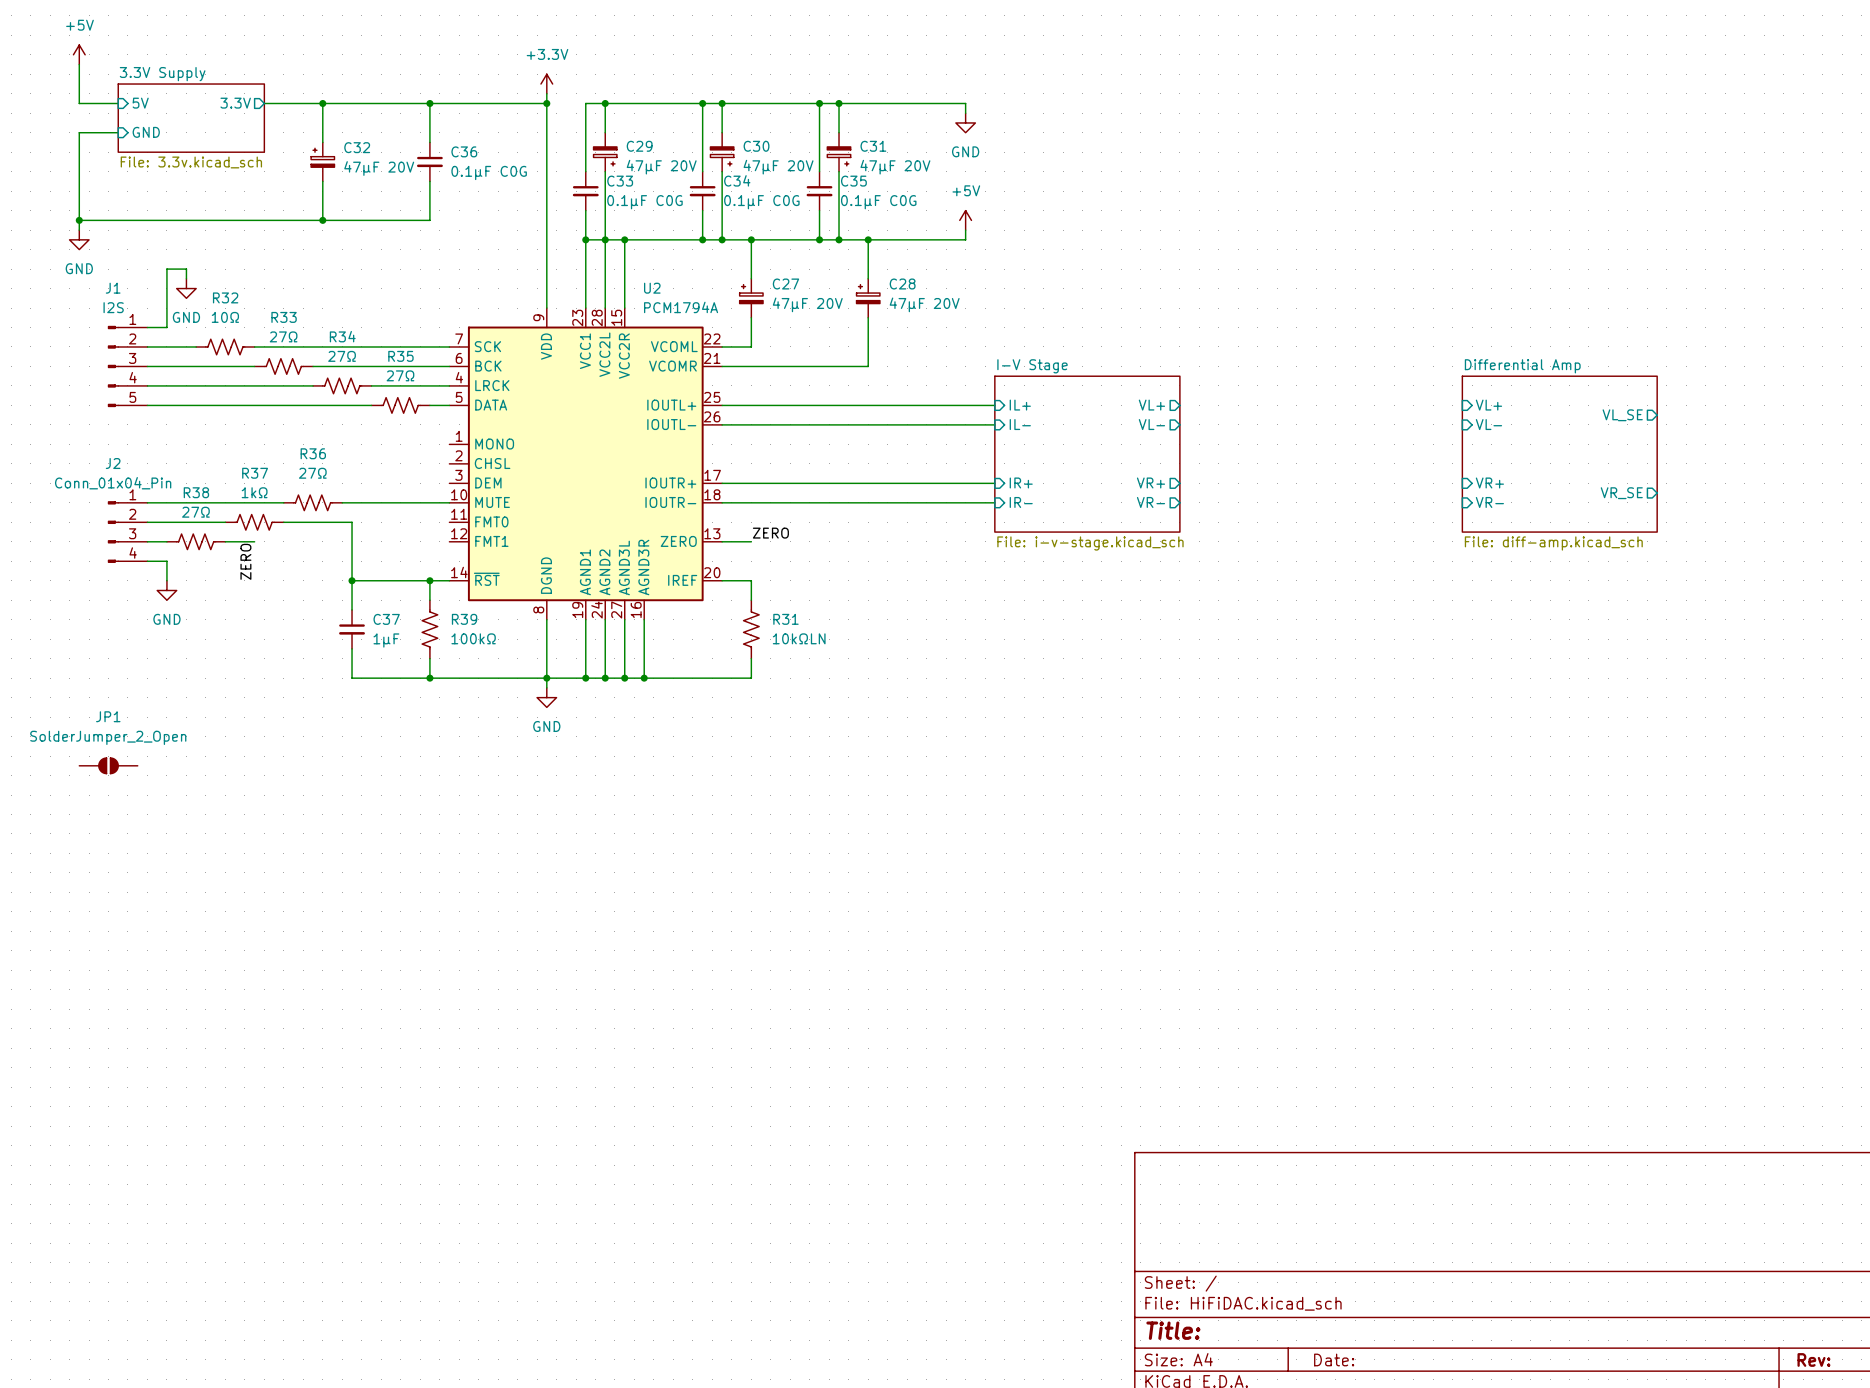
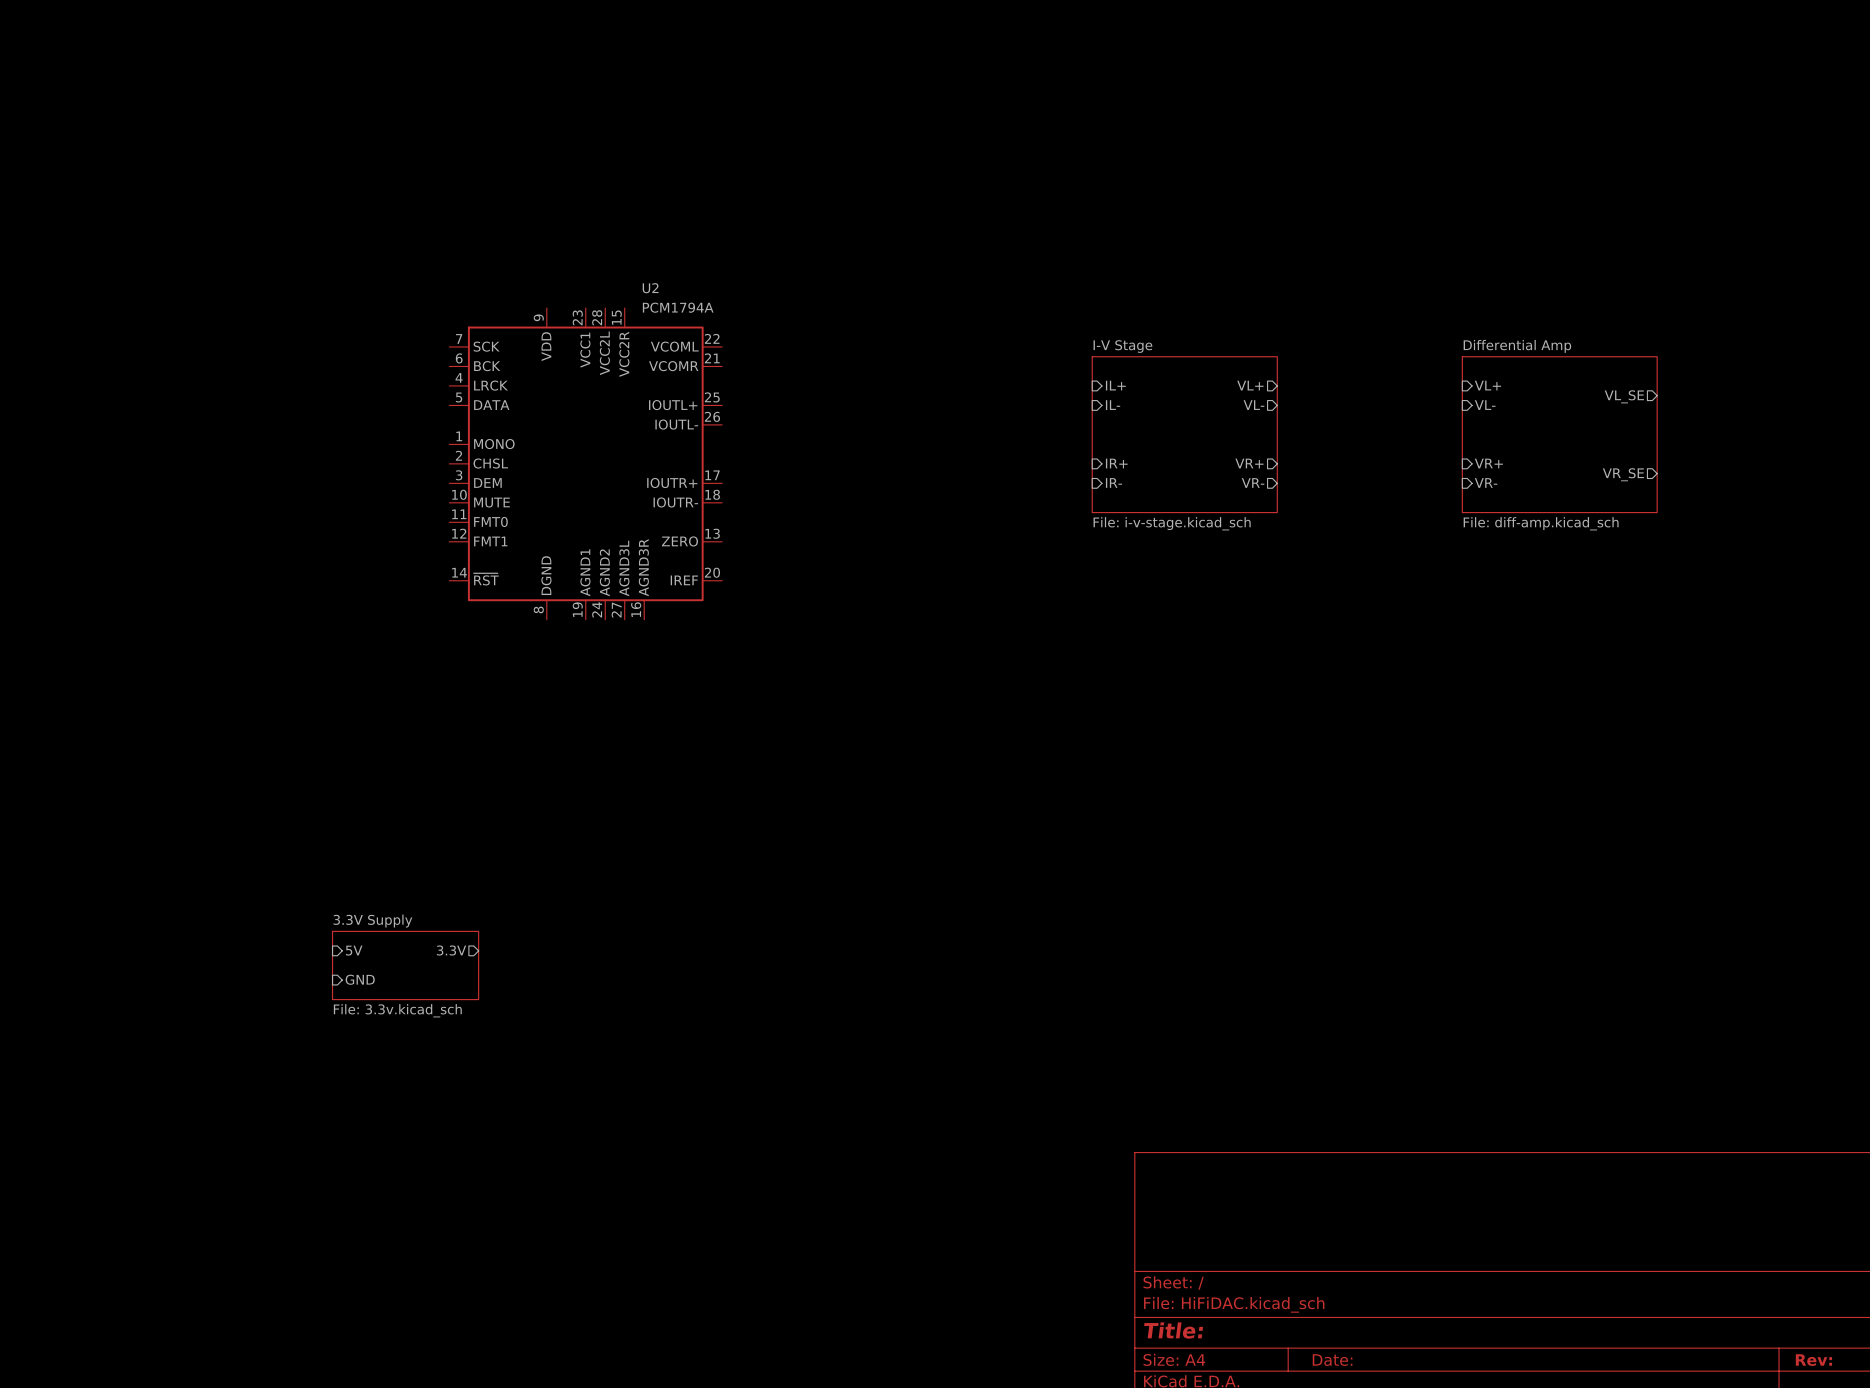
power symbol: +5V (79, 54) -> none
wire: (79, 64) (79, 103) (118, 103) -> none
power symbol: +3.3V (546, 84) -> none
wire: (546, 93) (546, 308) -> none
sheet pin: 5V (140, 103) -> none
sheet pin: 3.3V (235, 103) -> none
wire: (264, 103) (546, 103) -> none
wire: (322, 103) (322, 142) -> none
junction: (322, 103) -> none
wire: (429, 103) (429, 142) -> none
junction: (429, 103) -> none
junction: (546, 103) -> none
wire: (605, 103) (605, 132) -> none
junction: (605, 103) -> none
wire: (702, 103) (702, 171) -> none
junction: (702, 103) -> none
wire: (722, 103) (722, 132) -> none
junction: (722, 103) -> none
wire: (819, 103) (819, 171) -> none
junction: (819, 103) -> none
wire: (839, 103) (839, 132) -> none
junction: (839, 103) -> none
wire: (965, 113) (965, 103) (585, 103) (585, 171) -> none
sheet 3.3V Supply position: (191, 118) -> (405, 965)
power symbol: GND (965, 122) -> none
wire: (118, 132) (79, 132) (79, 230) -> none
sheet pin: GND (146, 132) -> none
C29: 47µF 20V (605, 152) -> none
C30: 47µF 20V (722, 152) -> none
C31: 47µF 20V (839, 152) -> none
C32: 47µF 20V (322, 161) -> none
C36: 0.1µF C0G (429, 161) -> none
wire: (605, 171) (605, 308) -> none
wire: (722, 171) (722, 239) -> none
wire: (839, 171) (839, 239) -> none
wire: (322, 181) (322, 220) -> none
wire: (429, 181) (429, 220) (79, 220) -> none
C33: 0.1µF C0G (585, 191) -> none
C34: 0.1µF C0G (702, 191) -> none
C35: 0.1µF C0G (819, 191) -> none
wire: (585, 210) (585, 308) -> none
wire: (702, 210) (702, 239) -> none
wire: (819, 210) (819, 239) -> none
junction: (79, 220) -> none
junction: (322, 220) -> none
power symbol: +5V (965, 220) -> none
wire: (965, 230) (965, 239) (585, 239) -> none
power symbol: GND (79, 239) -> none
junction: (585, 239) -> none
junction: (605, 239) -> none
wire: (624, 239) (624, 308) -> none
junction: (624, 239) -> none
junction: (702, 239) -> none
junction: (722, 239) -> none
wire: (751, 239) (751, 278) -> none
junction: (751, 239) -> none
junction: (819, 239) -> none
junction: (839, 239) -> none
wire: (868, 239) (868, 278) -> none
junction: (868, 239) -> none
wire: (186, 278) (186, 269) (166, 269) (166, 327) (147, 327) -> none
power symbol: GND (186, 288) -> none
C27: 47µF 20V (751, 298) -> none
C28: 47µF 20V (868, 298) -> none
wire: (751, 317) (751, 346) (722, 346) -> none
wire: (868, 317) (868, 366) (722, 366) -> none
wire: (147, 346) (196, 346) -> none
R32: 10Ω (225, 346) -> none
wire: (254, 346) (449, 346) -> none
J1: I2S (127, 366) -> none
wire: (147, 366) (254, 366) -> none
R33: 27Ω (283, 366) -> none
wire: (313, 366) (449, 366) -> none
wire: (147, 385) (313, 385) -> none
R34: 27Ω (342, 385) -> none
wire: (371, 385) (449, 385) -> none
sheet pin: none -> VL+ (1487, 385)
wire: (147, 405) (371, 405) -> none
R35: 27Ω (400, 405) -> none
wire: (429, 405) (449, 405) -> none
wire: (722, 405) (994, 405) -> none
sheet pin position: IL+ (1020, 405) -> IL+ (1115, 385)
sheet pin position: VL+ (1151, 405) -> VL+ (1250, 385)
sheet pin: VL+ (1488, 405) -> VL- (1485, 405)
sheet pin position: VL_SE (1622, 415) -> VL_SE (1624, 396)
wire: (722, 424) (994, 424) -> none
sheet pin position: IL- (1020, 424) -> IL- (1113, 405)
sheet pin position: VL- (1151, 424) -> VL- (1253, 405)
sheet pin: VL- (1488, 424) -> none
sheet I-V Stage position: (1087, 454) -> (1184, 434)
sheet Differential Amp position: (1559, 454) -> (1559, 434)
sheet pin: none -> VR+ (1488, 463)
sheet pin position: IR+ (1021, 482) -> IR+ (1116, 463)
sheet pin position: VR+ (1151, 482) -> VR+ (1249, 463)
sheet pin: VR+ (1489, 482) -> VR- (1486, 482)
wire: (722, 483) (994, 483) -> none
sheet pin position: VR_SE (1621, 493) -> VR_SE (1623, 474)
wire: (147, 502) (283, 502) -> none
R36: 27Ω (313, 502) -> none
wire: (342, 502) (449, 502) -> none
wire: (722, 502) (994, 502) -> none
sheet pin position: IR- (1021, 502) -> IR- (1113, 482)
sheet pin position: VR- (1151, 502) -> VR- (1253, 482)
sheet pin: VR- (1489, 502) -> none
wire: (147, 522) (225, 522) -> none
R37: 1kΩ (254, 522) -> none
wire: (283, 522) (352, 522) (352, 609) -> none
J2: Conn_01x04_Pin (127, 532) -> none
label: ZERO (770, 533) -> none
wire: (147, 541) (166, 541) -> none
R38: 27Ω (196, 541) -> none
wire: (225, 541) (254, 541) -> none
wire: (722, 541) (751, 541) -> none
wire: (147, 561) (166, 561) (166, 580) -> none
label: ZERO (245, 561) -> none
wire: (352, 580) (449, 580) -> none
junction: (352, 580) -> none
wire: (429, 580) (429, 600) -> none
junction: (429, 580) -> none
wire: (722, 580) (751, 580) (751, 600) -> none
power symbol: GND (166, 590) -> none
wire: (546, 619) (546, 687) -> none
wire: (585, 619) (585, 678) -> none
wire: (605, 619) (605, 678) -> none
wire: (624, 619) (624, 678) -> none
wire: (644, 619) (644, 678) -> none
C37: 1µF (352, 629) -> none
R39: 100kΩ (429, 629) -> none
R31: 10kΩLN (751, 629) -> none
wire: (352, 648) (352, 678) (751, 678) (751, 658) -> none
wire: (429, 658) (429, 678) -> none
junction: (429, 678) -> none
junction: (546, 678) -> none
junction: (585, 678) -> none
junction: (605, 678) -> none
junction: (624, 678) -> none
junction: (644, 678) -> none
power symbol: GND (546, 697) -> none
JP1: SolderJumper_2_Open (108, 765) -> none
sheet pin: none -> 5V (354, 950)
sheet pin: none -> 3.3V (451, 950)
sheet pin: none -> GND (360, 979)

